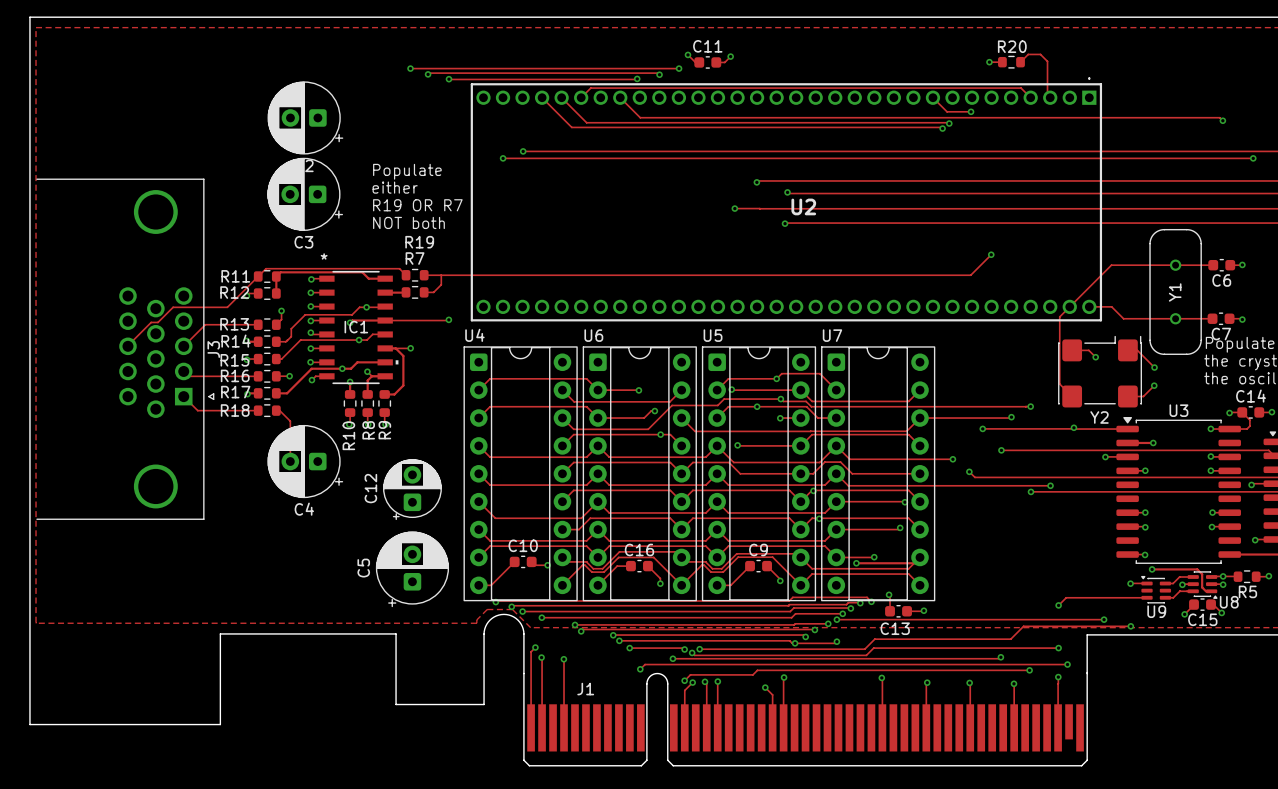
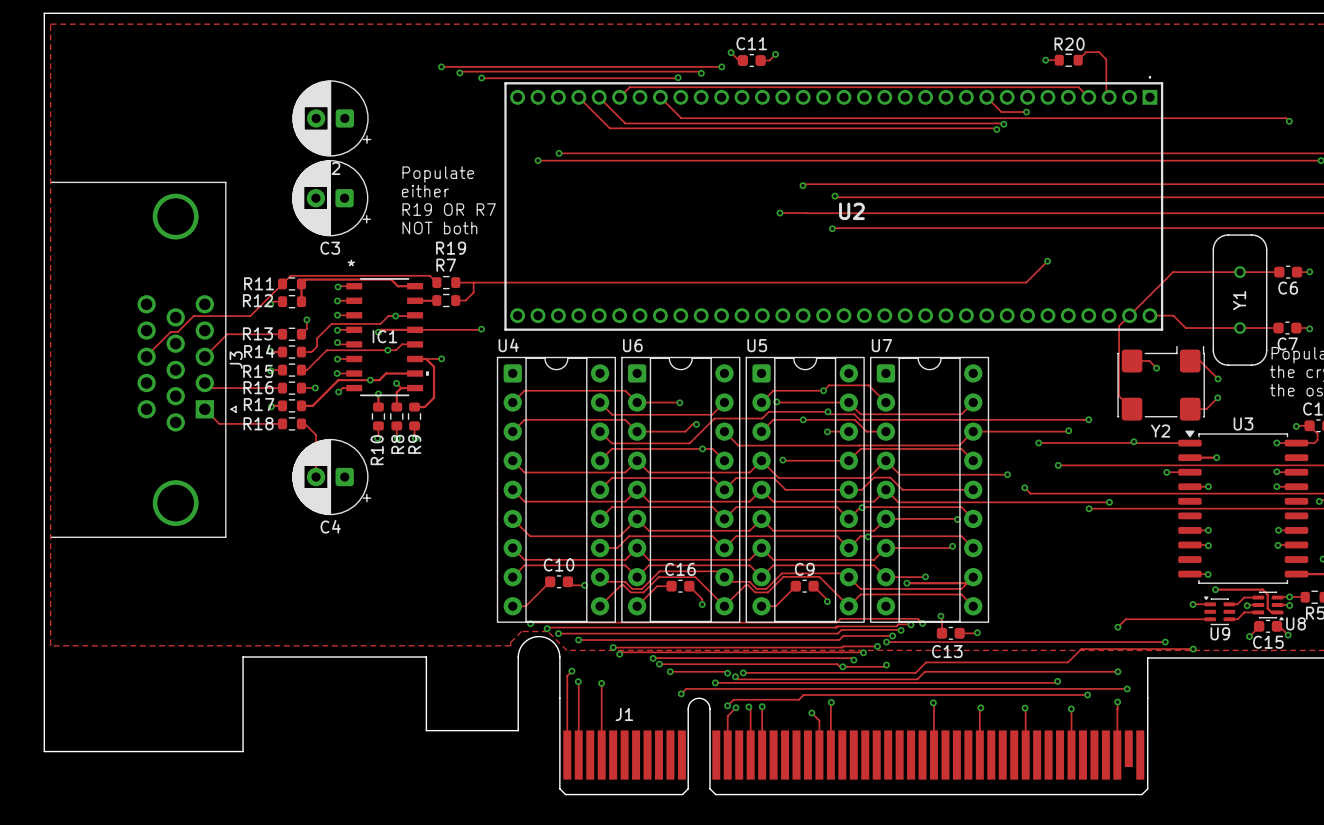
C12: (412, 489) -> none
C5: (412, 569) -> none

